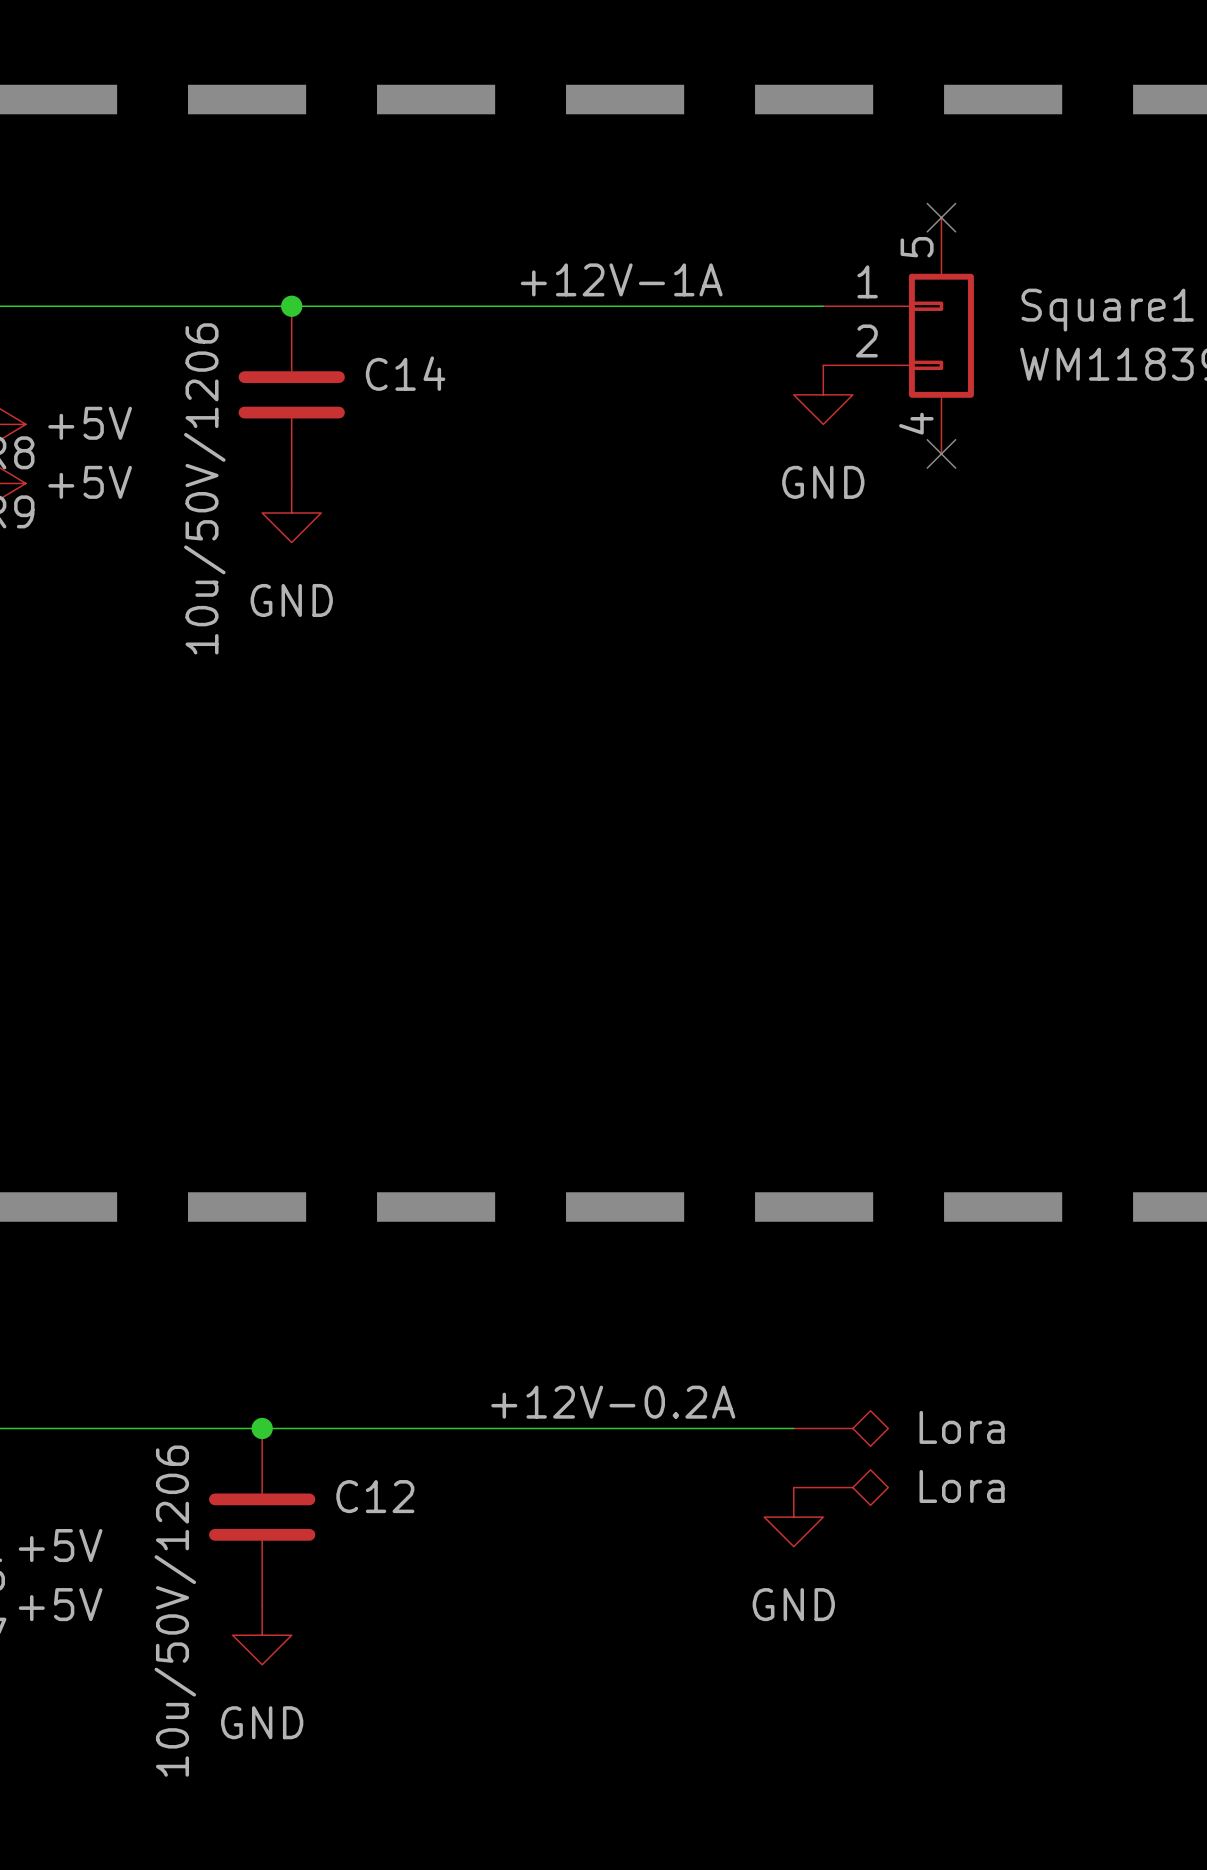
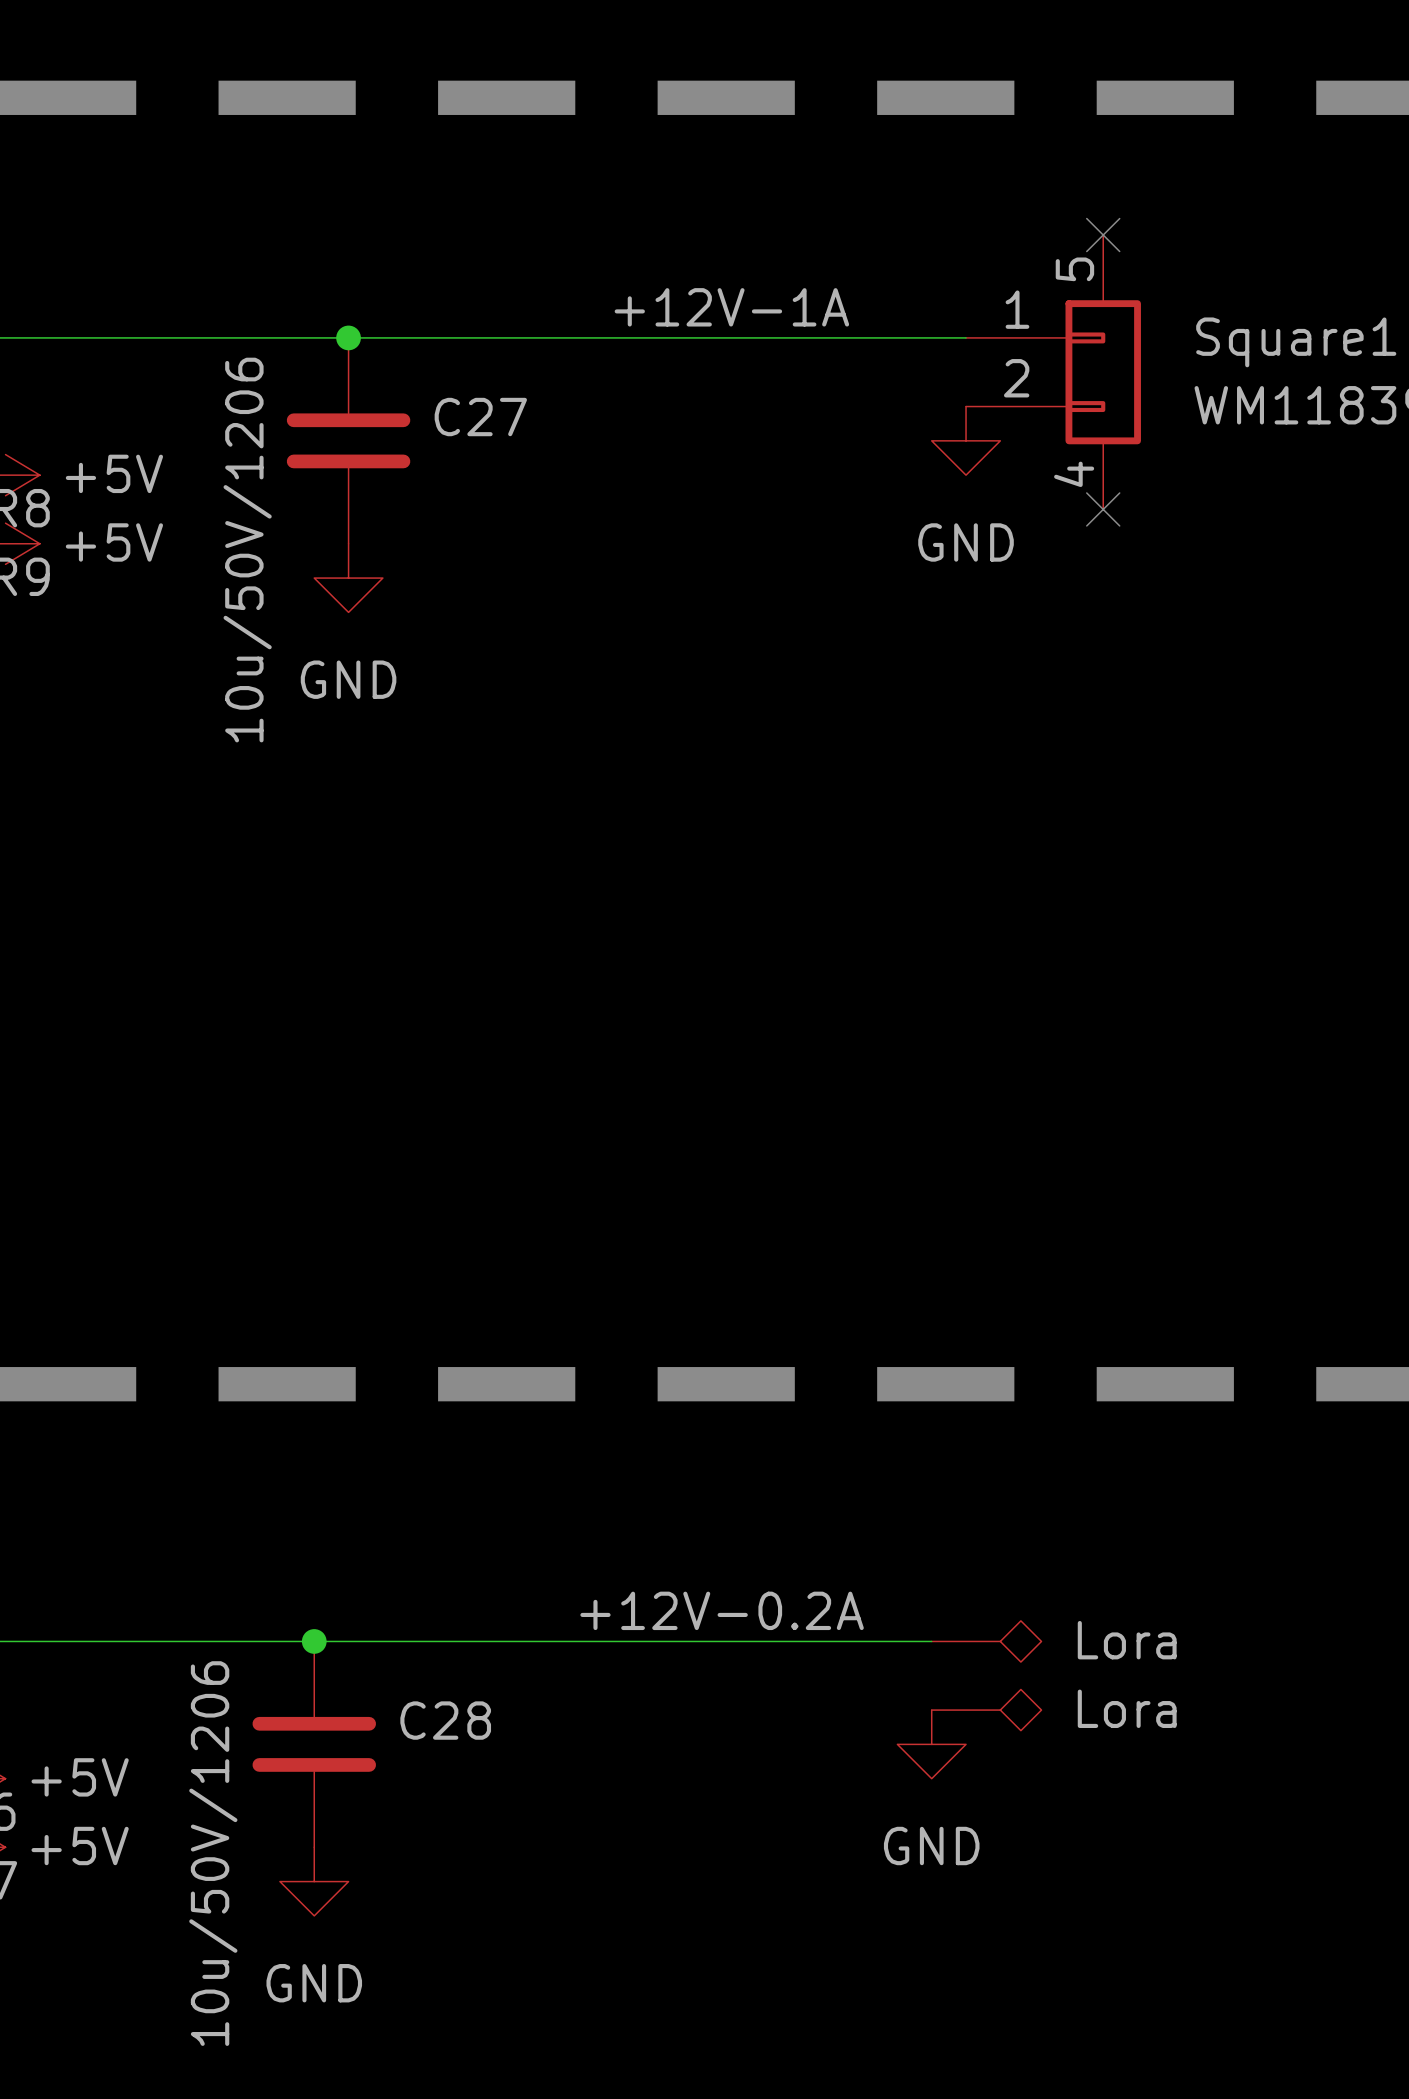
C14 name: C14 (405, 373) -> C27 (480, 417)
C12 name: C12 (375, 1496) -> C28 (445, 1720)

